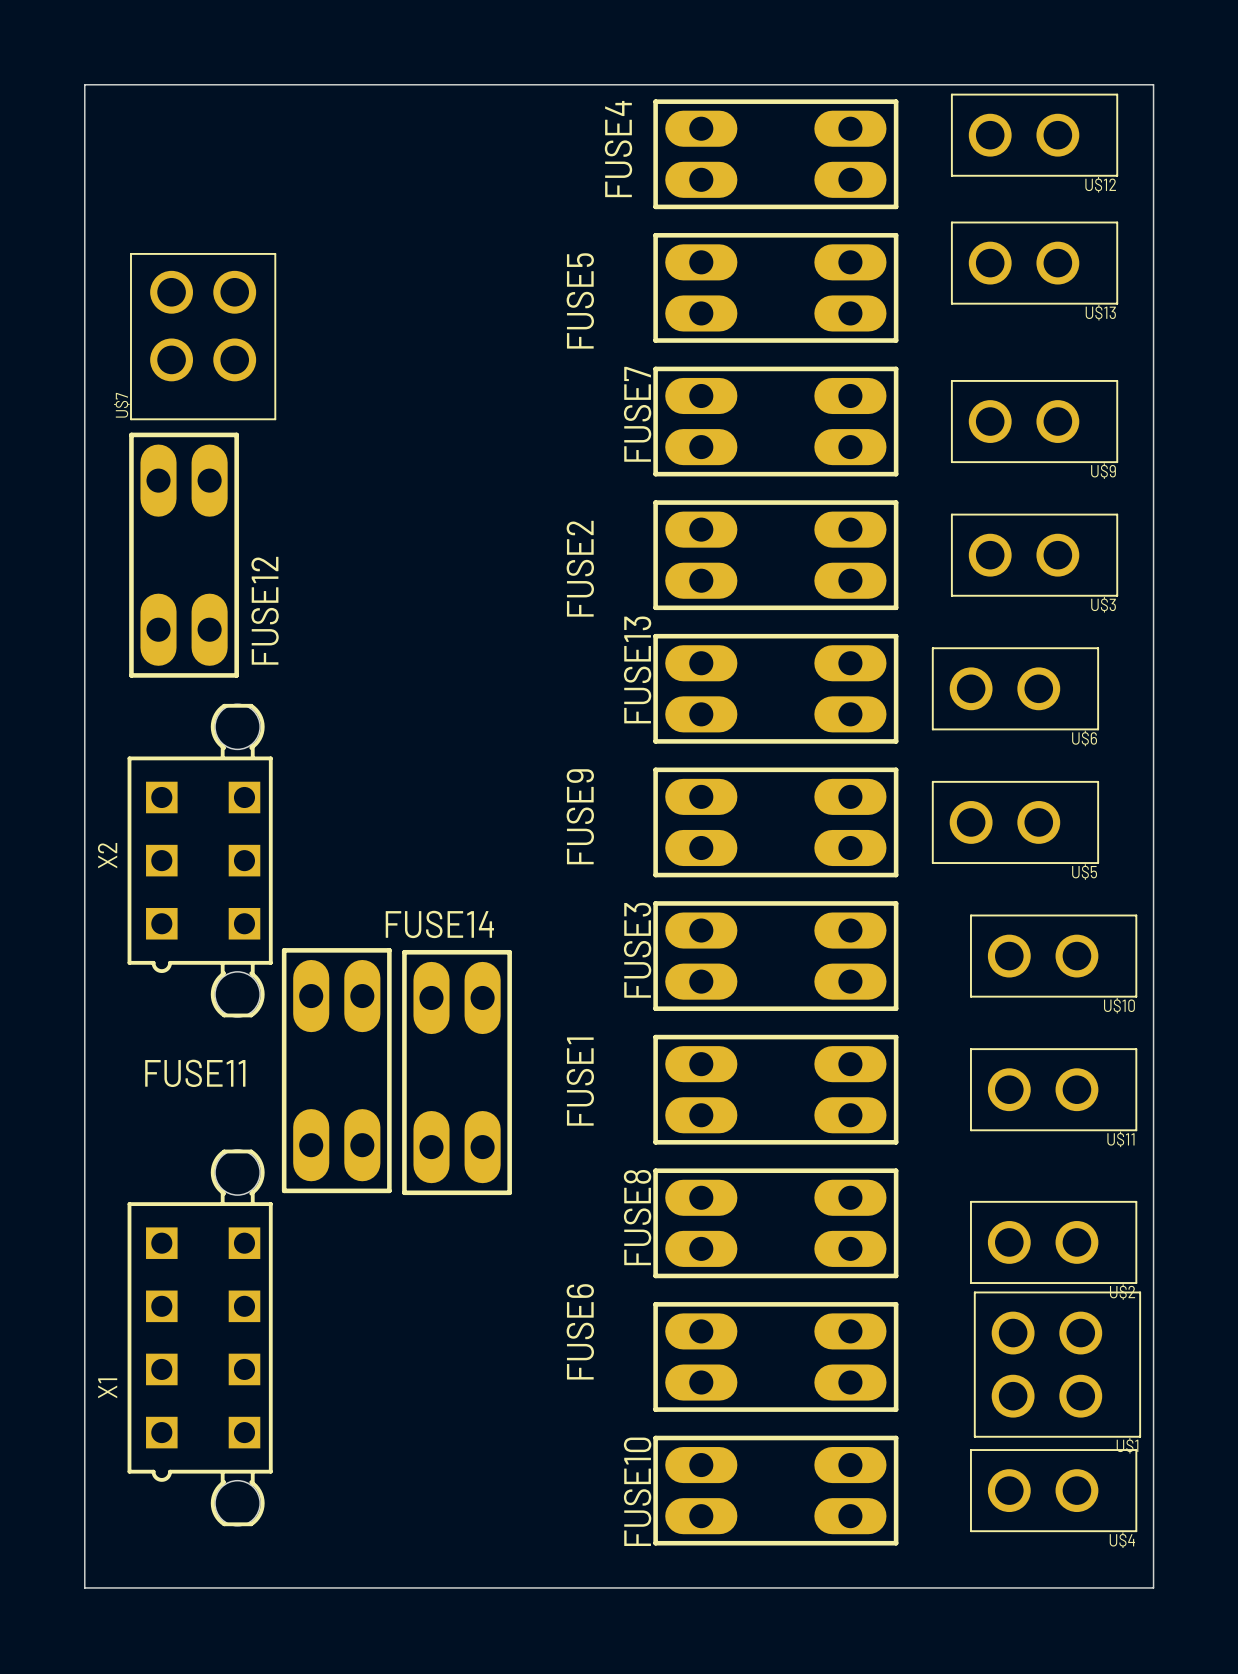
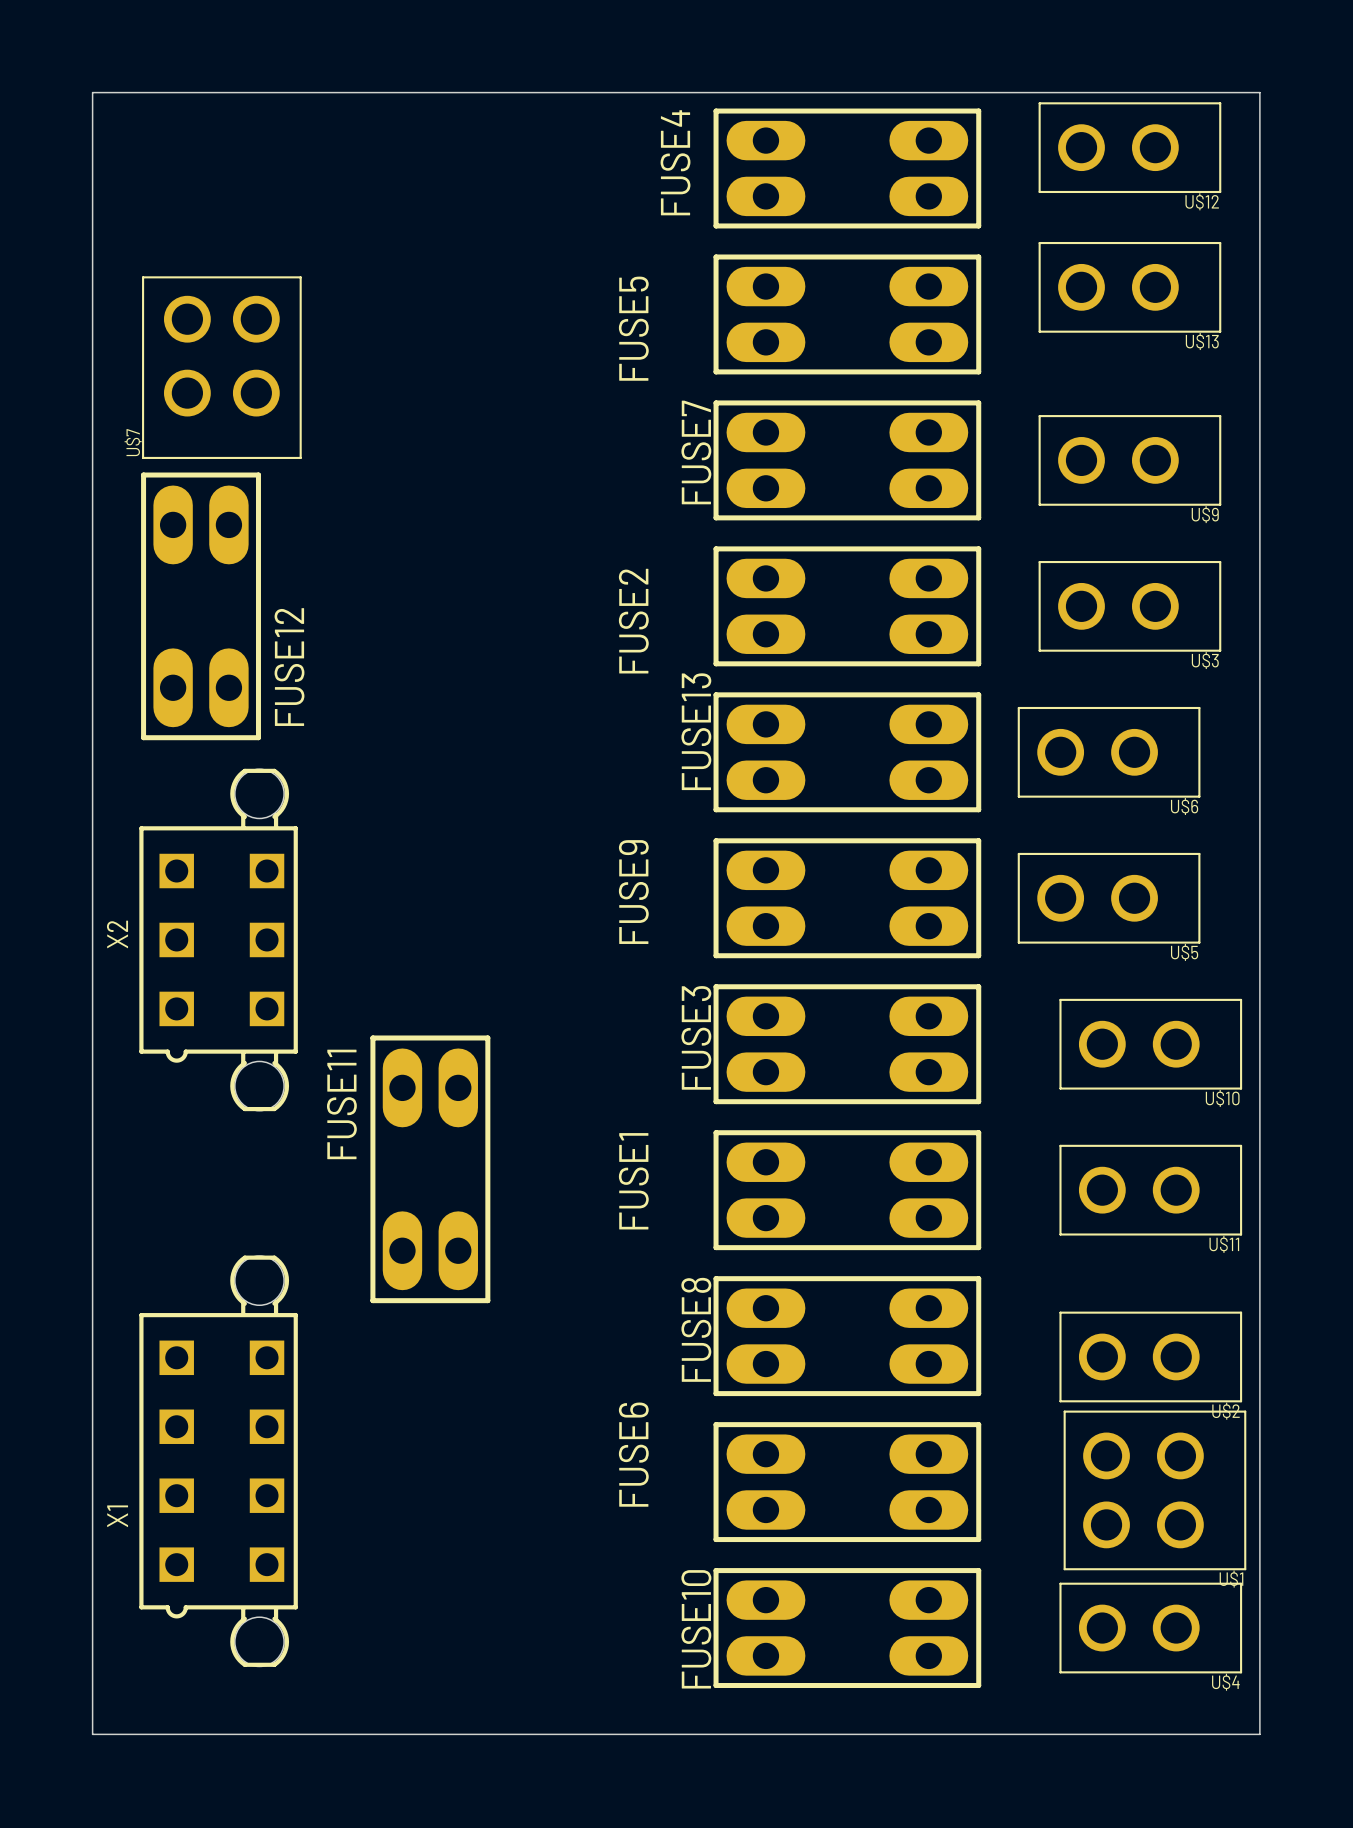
FUSE11 position: (336, 1070) -> (430, 1169)
FUSE14: (457, 1072) -> none
FUSE11 name rotation: 0° (195, 1073) -> 90° counterclockwise (341, 1104)

